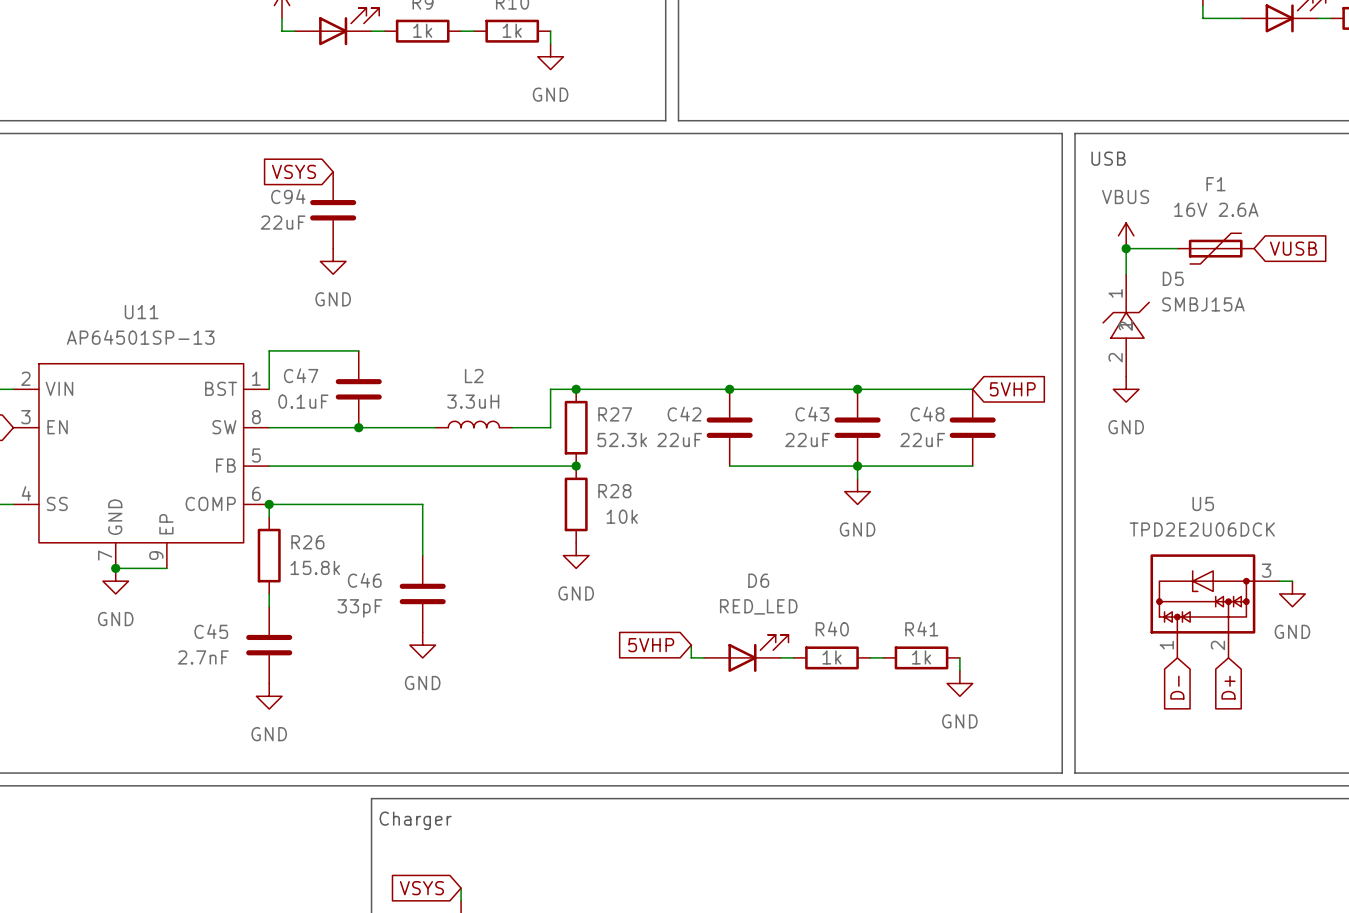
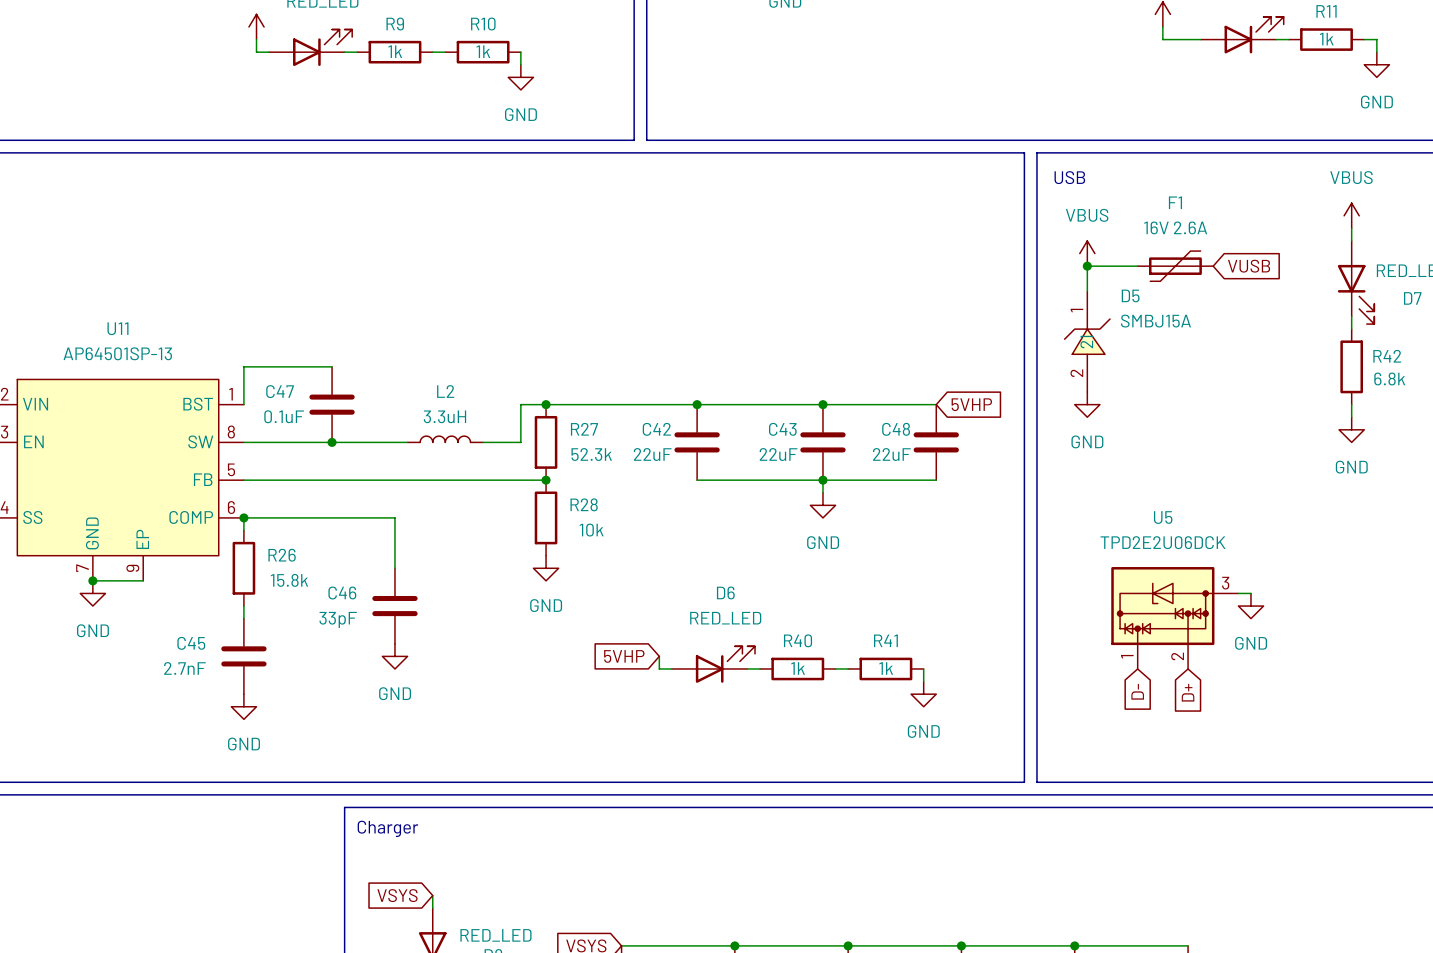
global label: VSYS (294, 171) -> none
C94: 22uF (333, 210) -> none
power symbol: GND (333, 261) -> none

